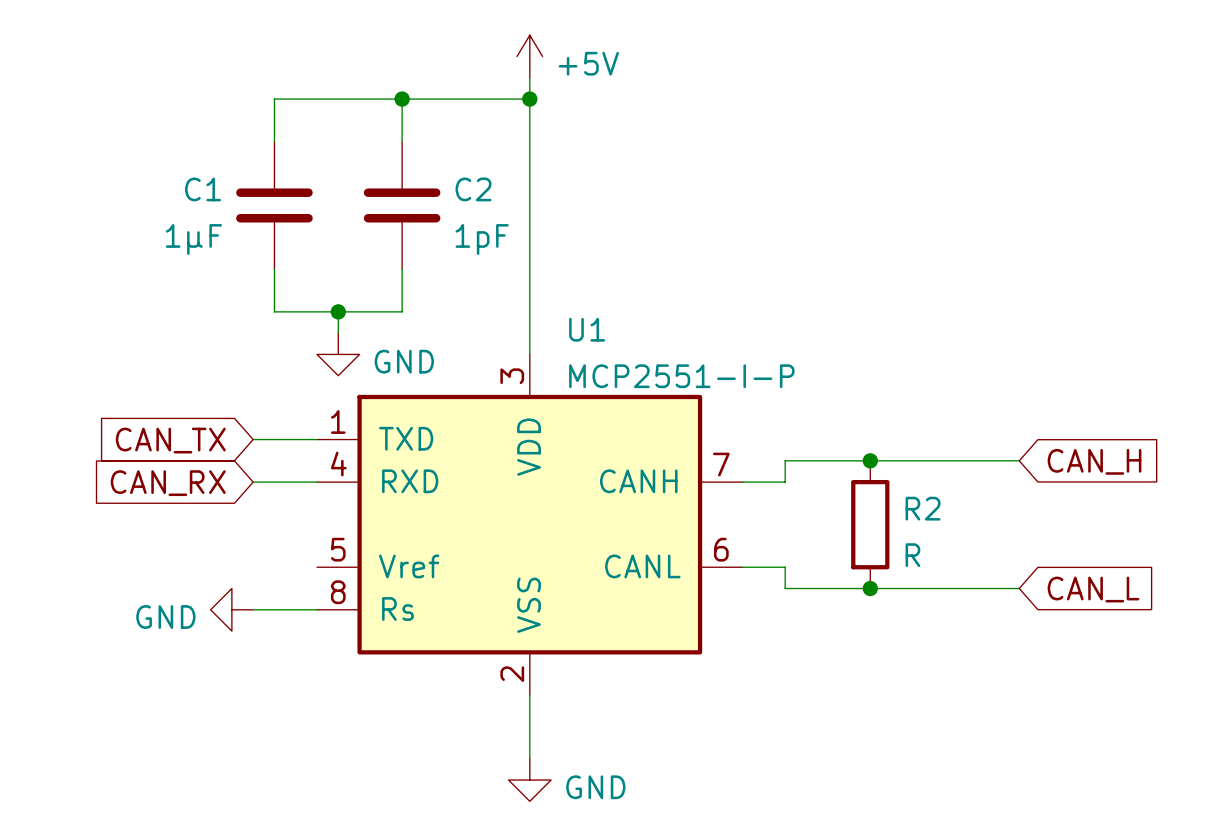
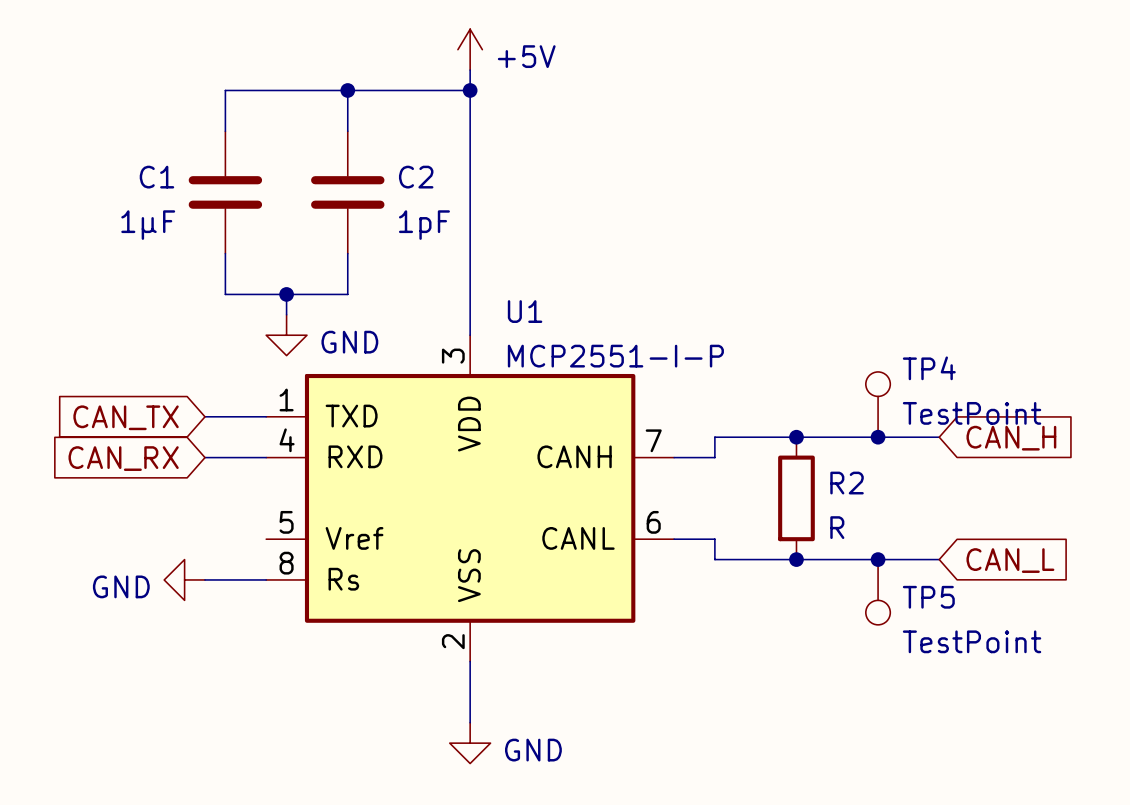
TP4: none -> TestPoint (878, 404)
junction: none -> (878, 437)
junction: none -> (878, 559)
TP5: none -> TestPoint (878, 592)

